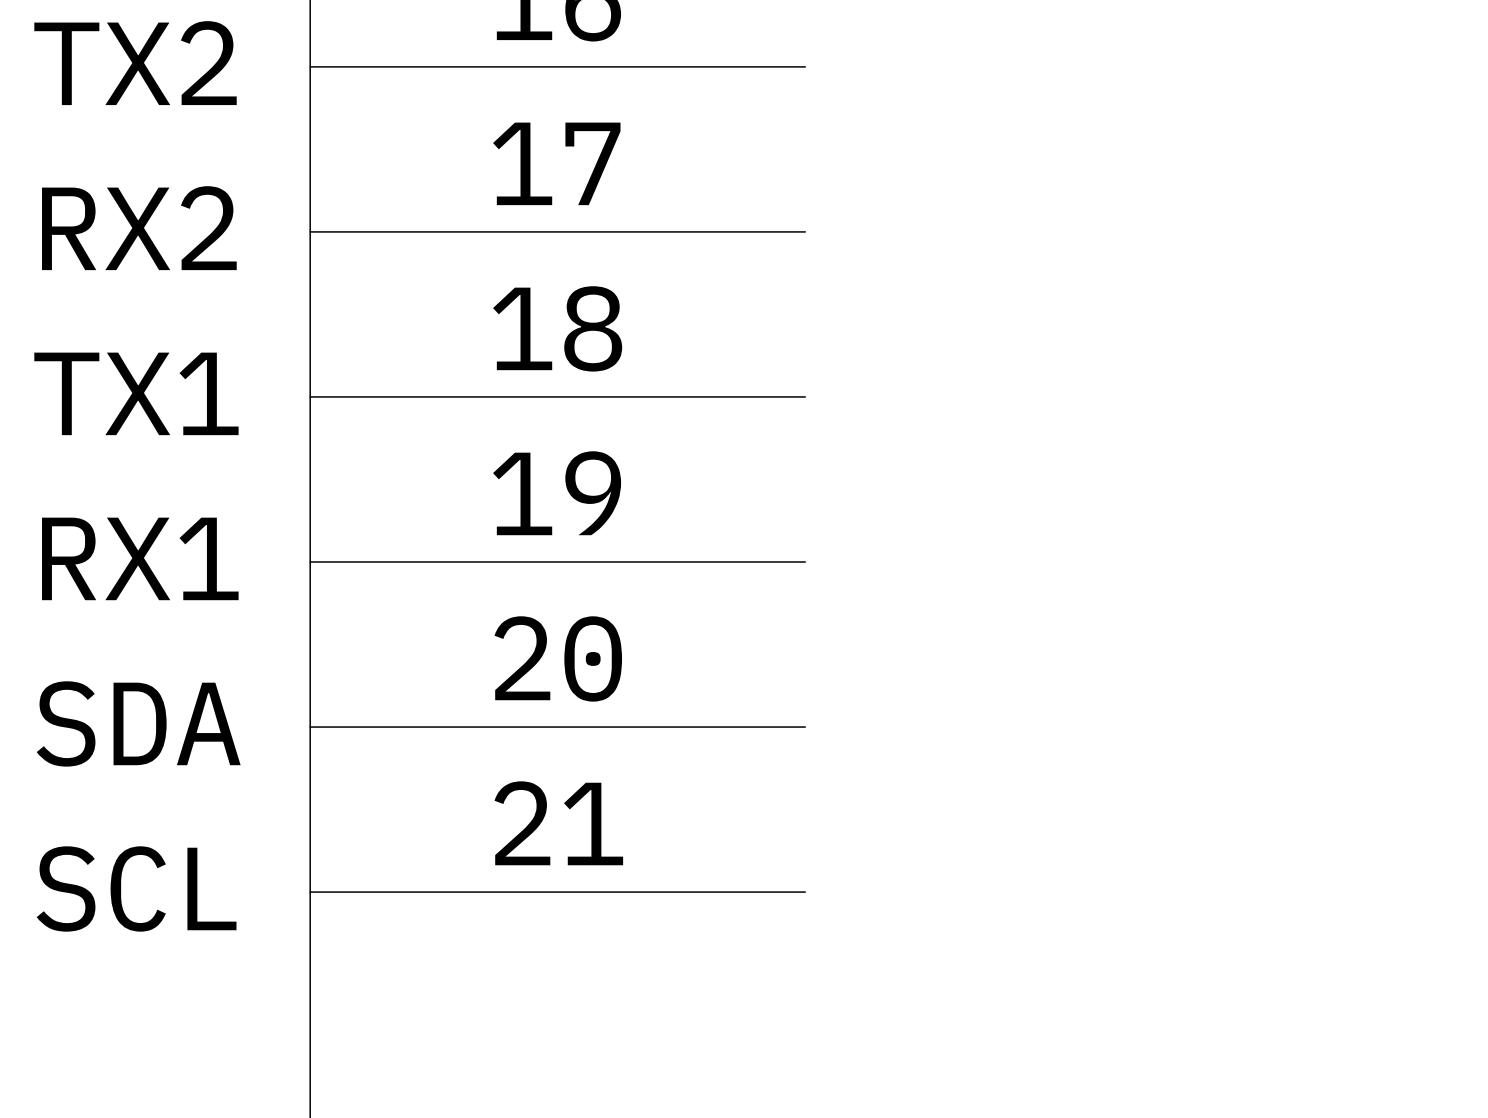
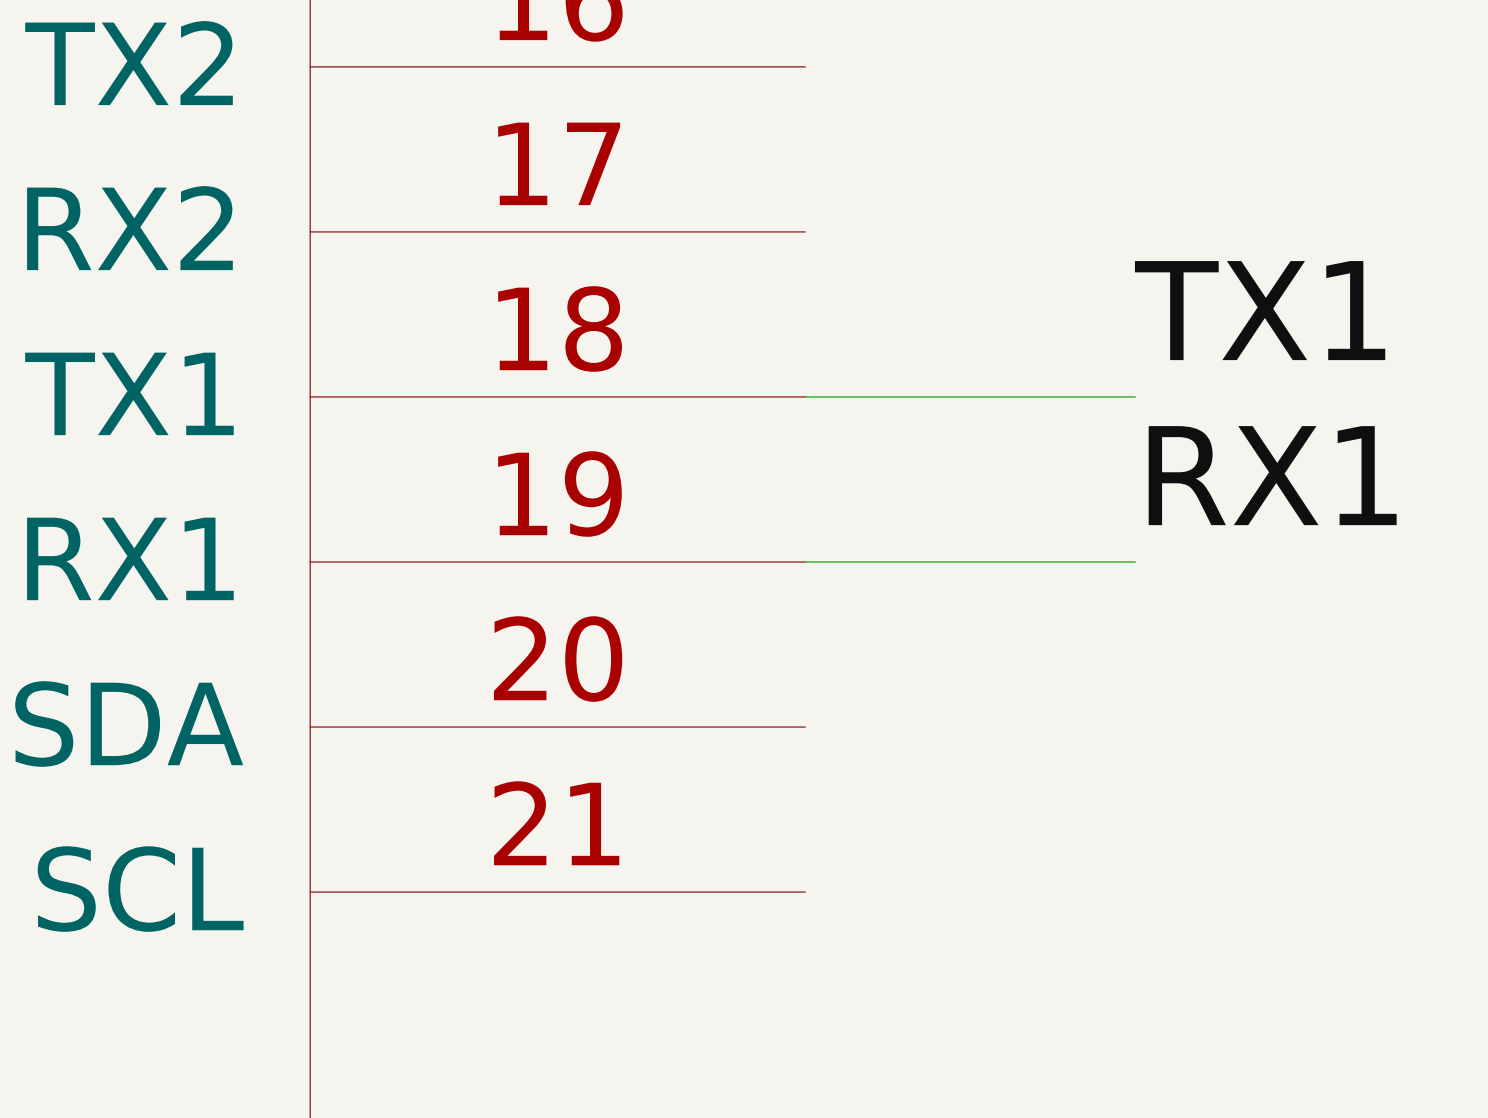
label: none -> TX1 (1260, 310)
wire: none -> (805, 396) (1135, 396)
label: none -> RX1 (1272, 475)
wire: none -> (805, 562) (1135, 562)

